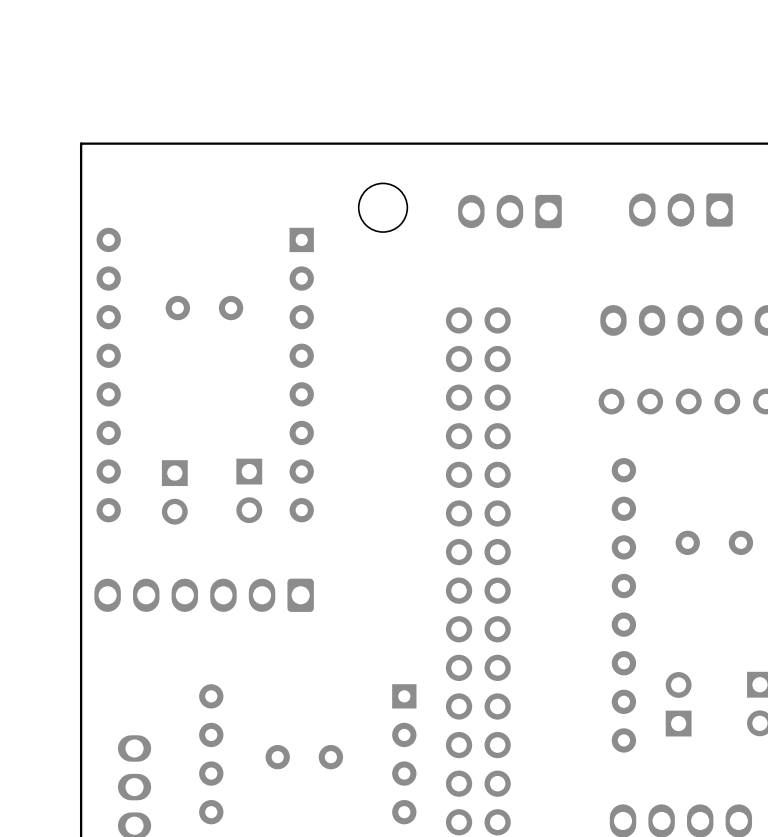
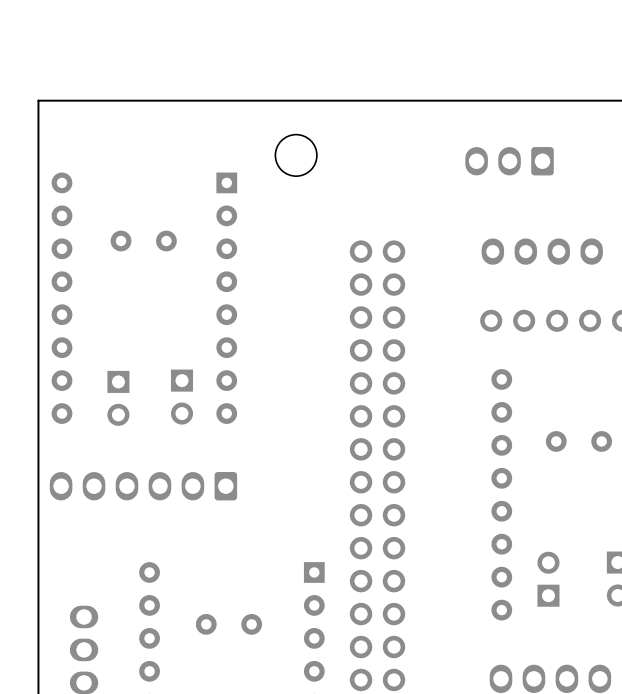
part position: (680, 210) -> (509, 161)
part: (509, 211) -> none

